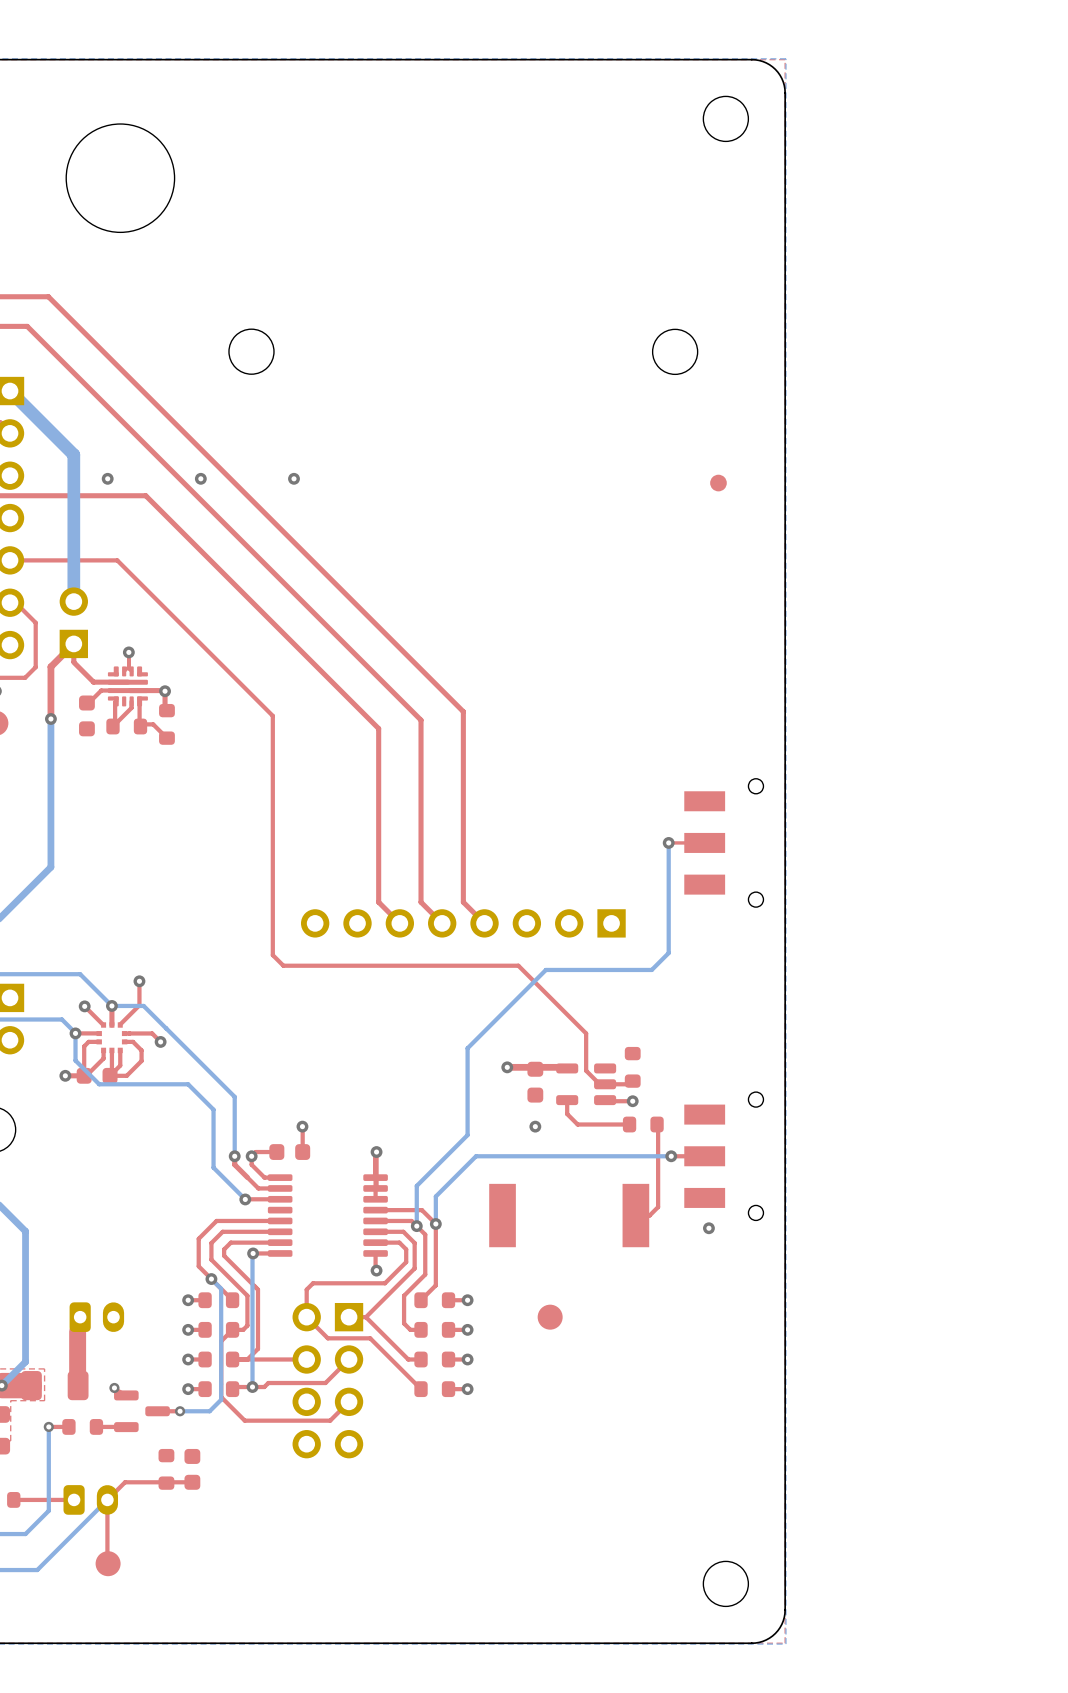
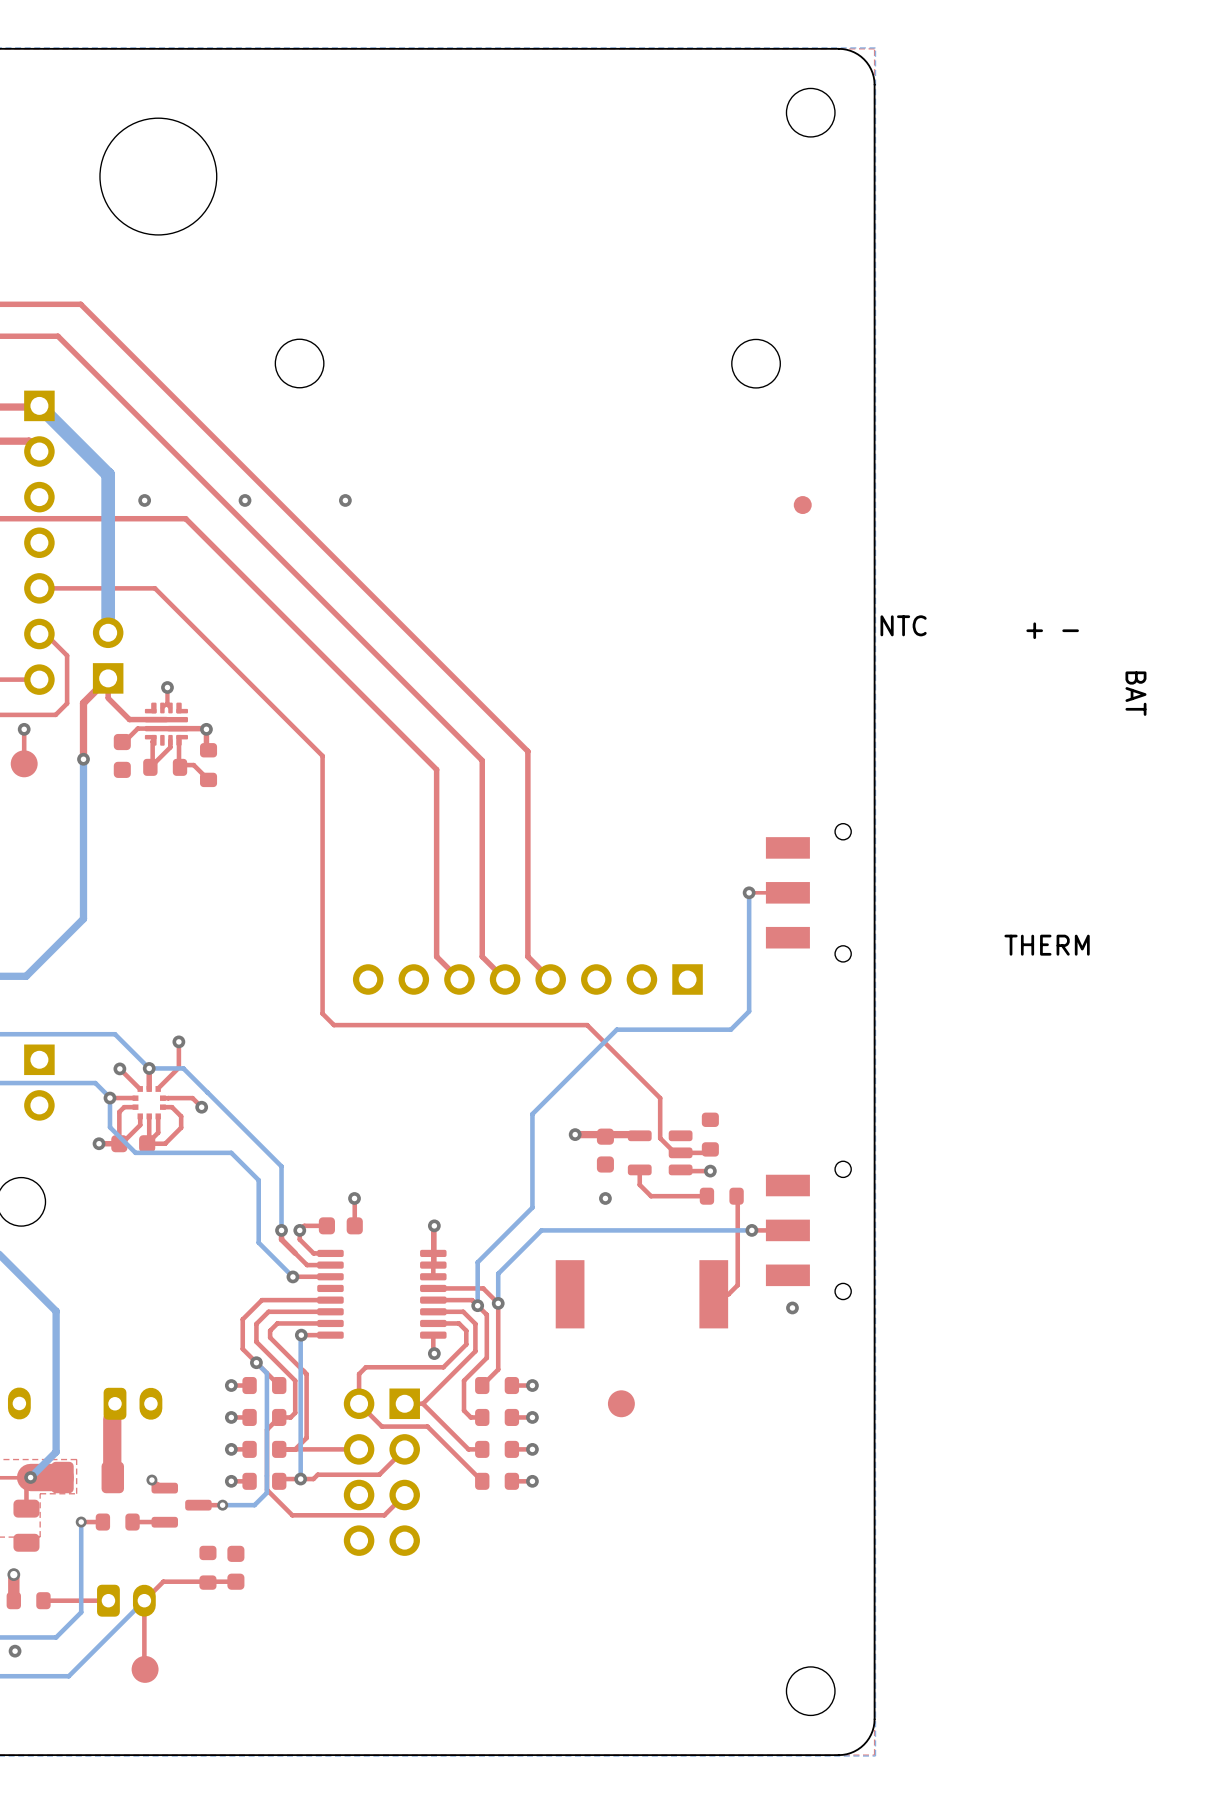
text: none -> NTC (903, 625)
text: none -> + (1034, 630)
text: none -> - (1070, 630)
text: none -> BAT (1135, 693)
text: none -> THERM (1047, 945)

